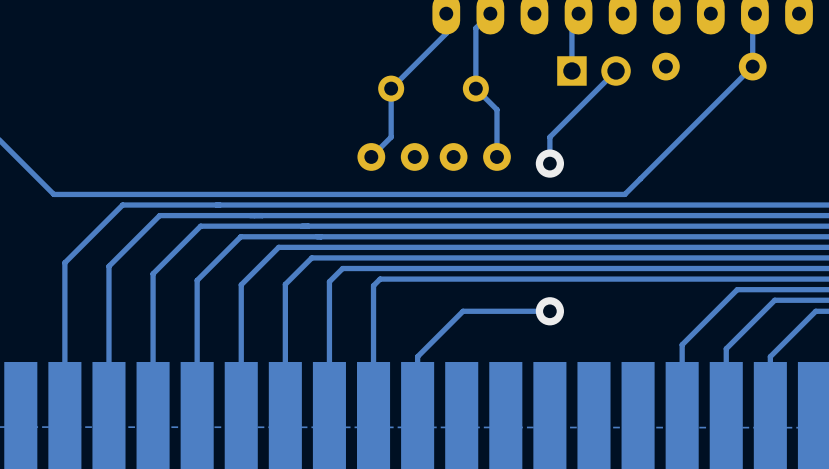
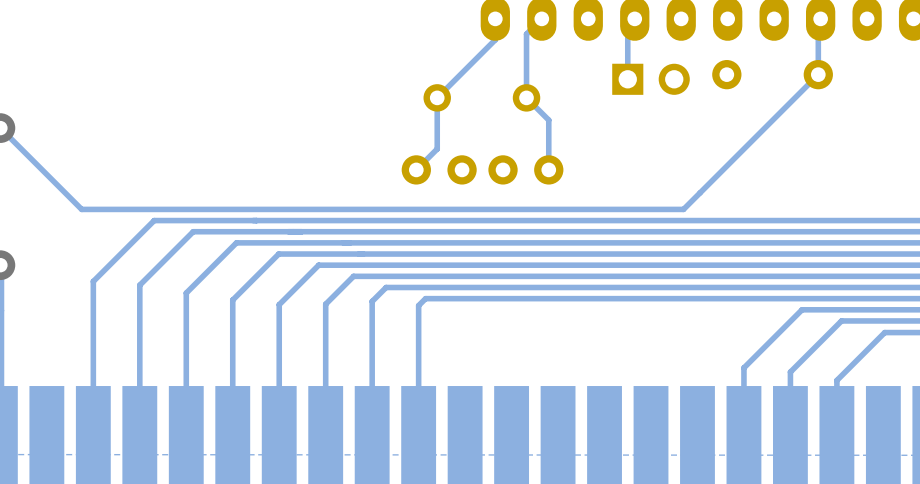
track: (616, 70) (549, 137) (549, 163) -> none
via: (549, 163) -> none
track: (549, 311) (463, 311) (417, 356) (417, 421) -> none
via: (549, 311) -> none

